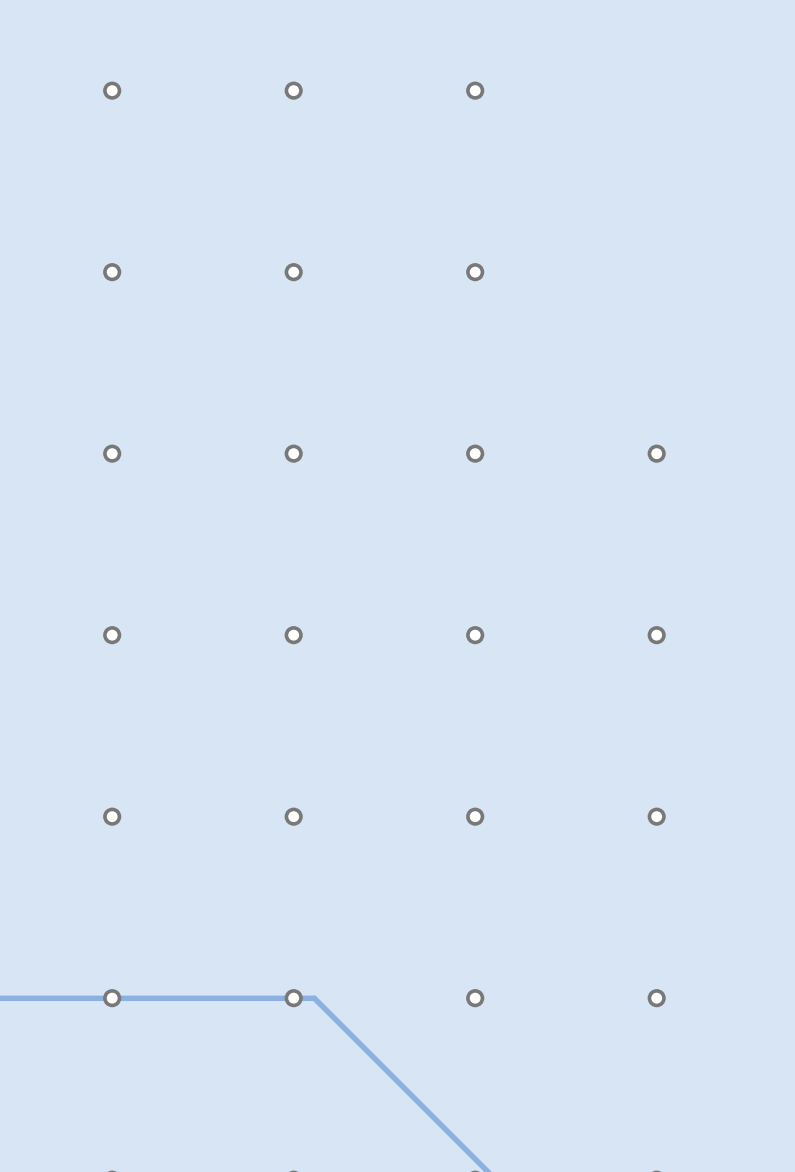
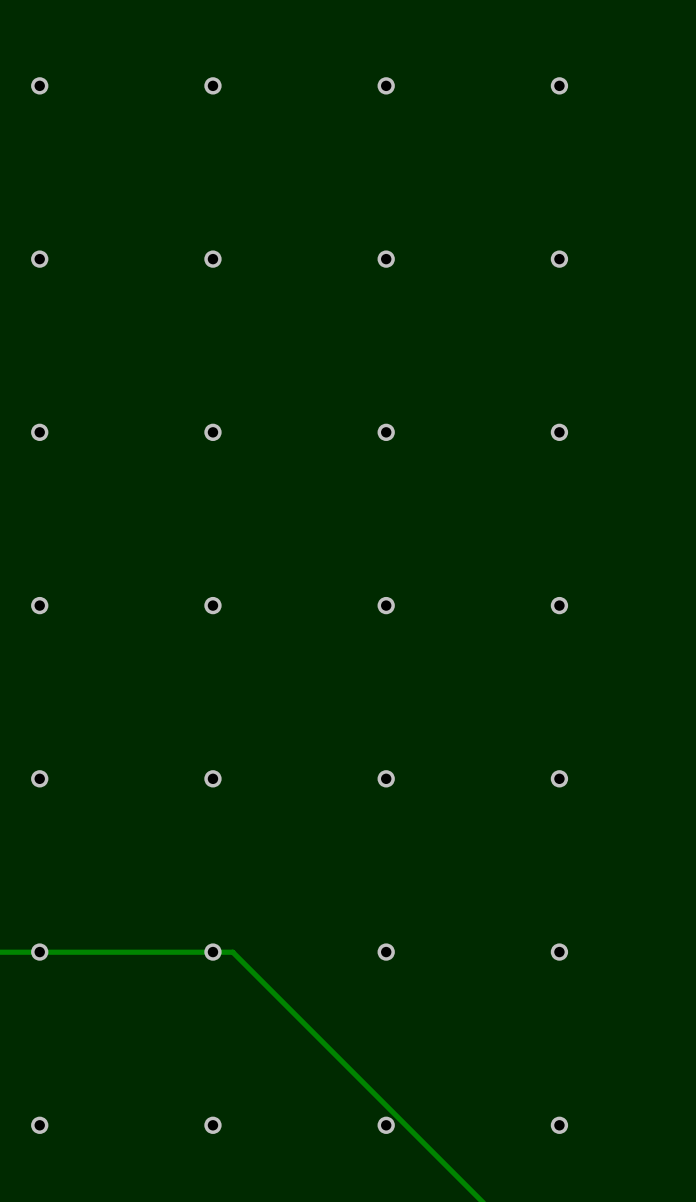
via: none -> (559, 85)
via: none -> (559, 259)

